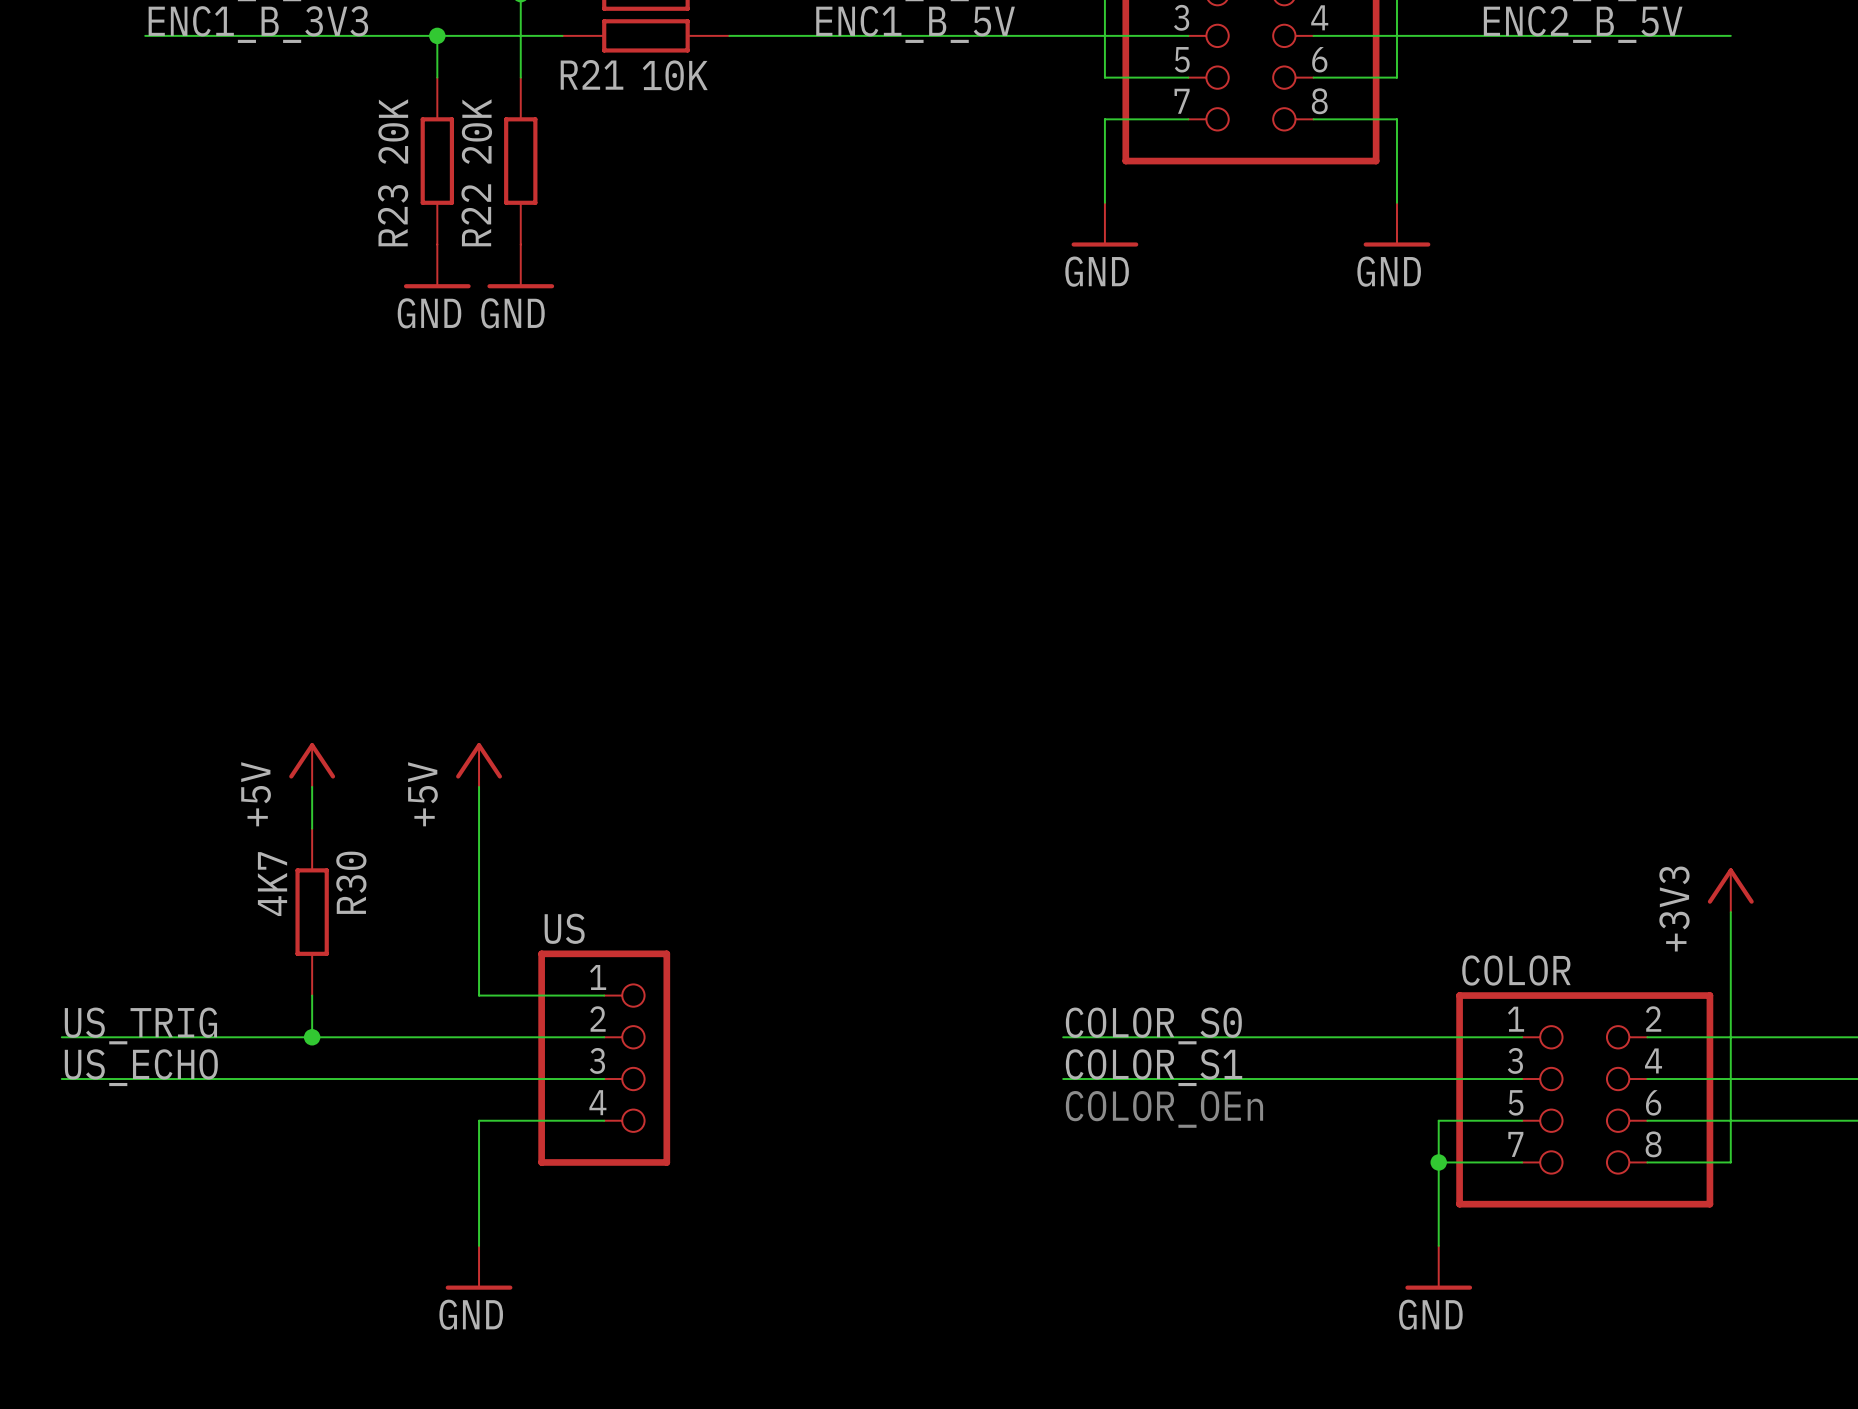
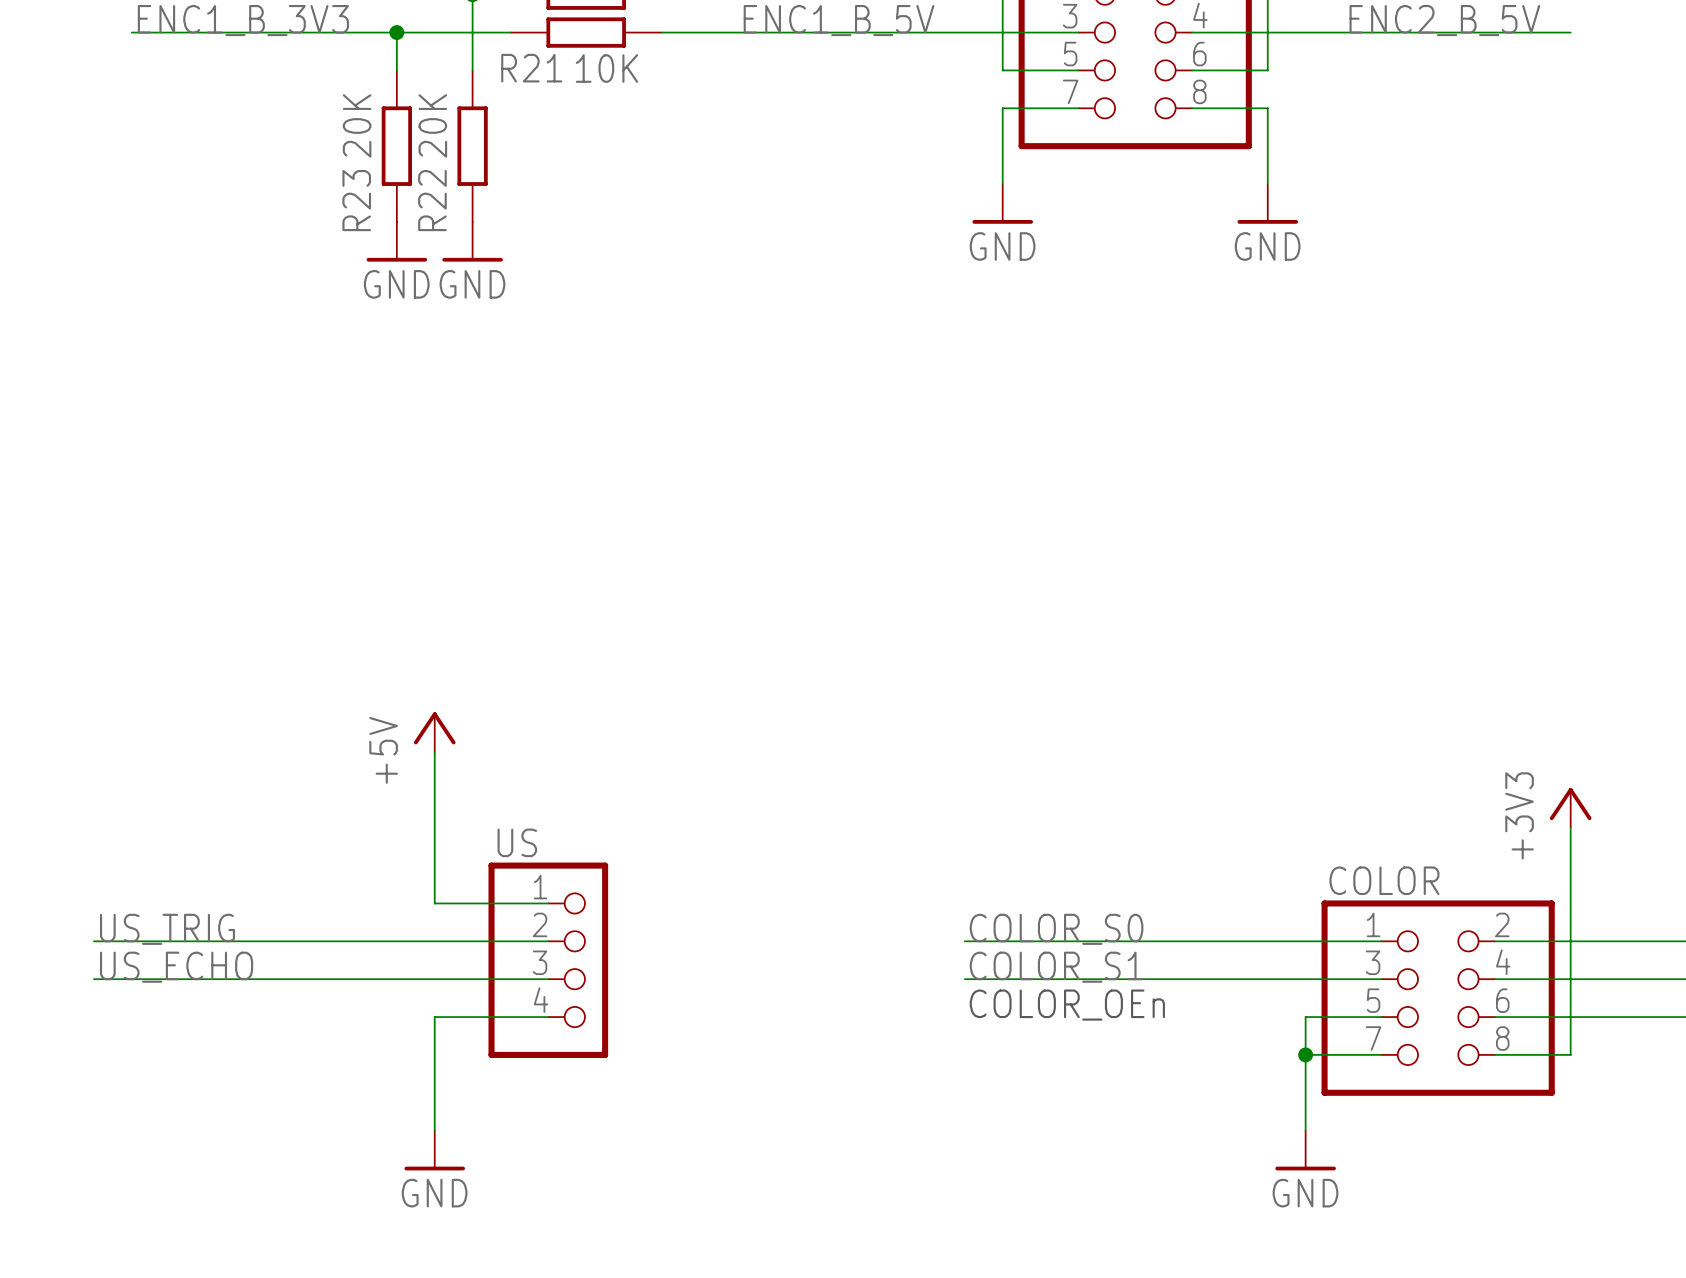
power symbol: +5V (312, 765) -> none
power symbol position: +5V (479, 765) -> +5V (434, 732)
wire: (312, 786) (312, 828) -> none
R30: 4K7 (312, 912) -> none
wire: (312, 995) (312, 1037) -> none
label position: US_TRIG (140, 1025) -> US_TRIG (167, 929)
wire: (61, 1037) (103, 1037) -> none
junction: (312, 1037) -> none
label position: US_ECHO (141, 1067) -> US_ECHO (176, 967)
wire: (61, 1079) (103, 1079) -> none

